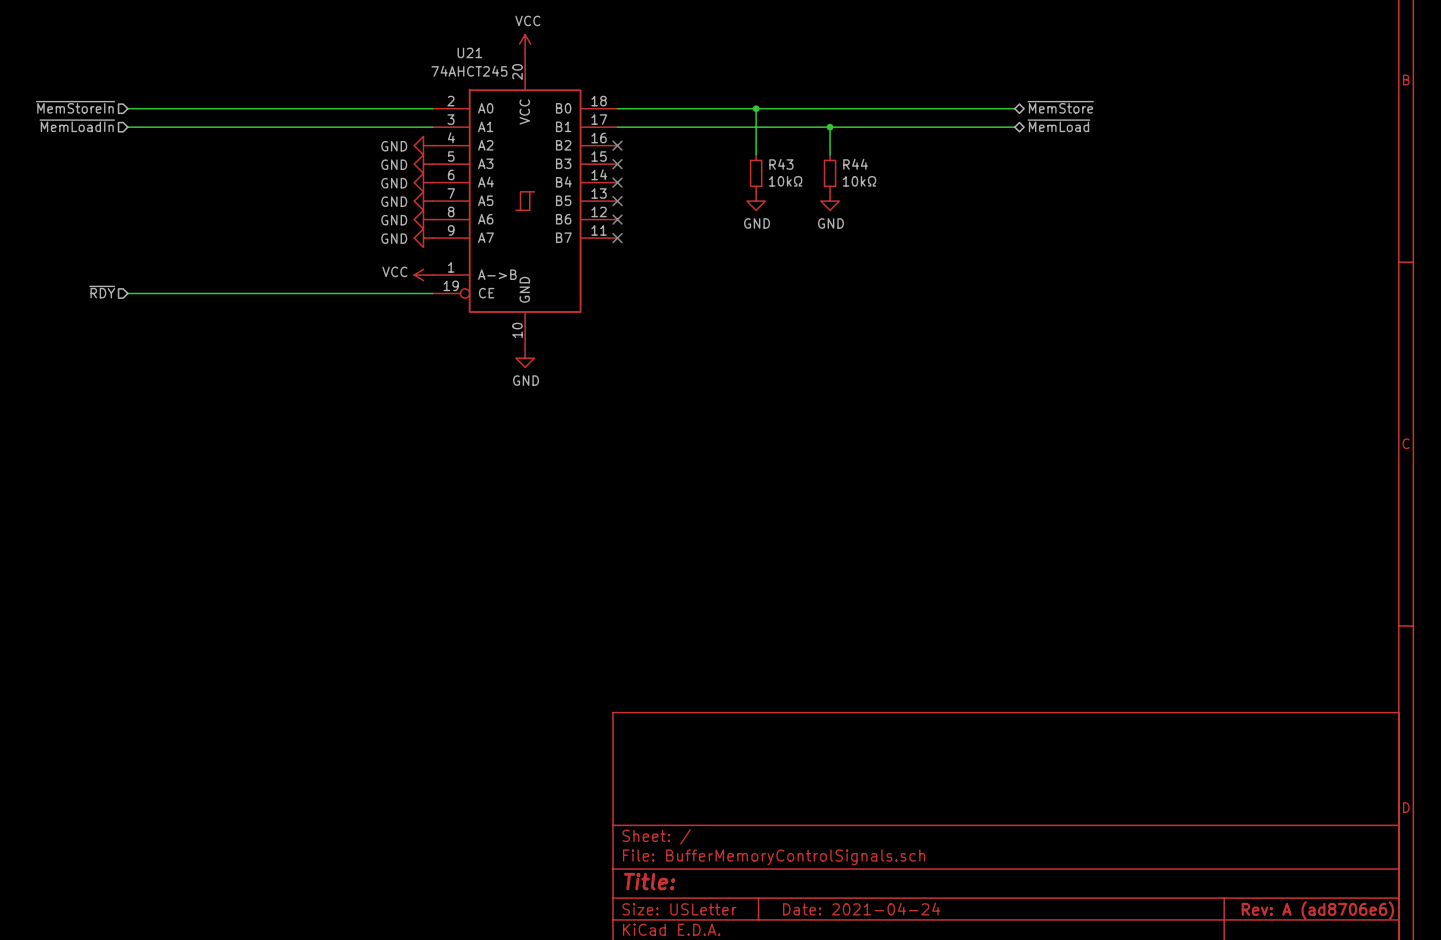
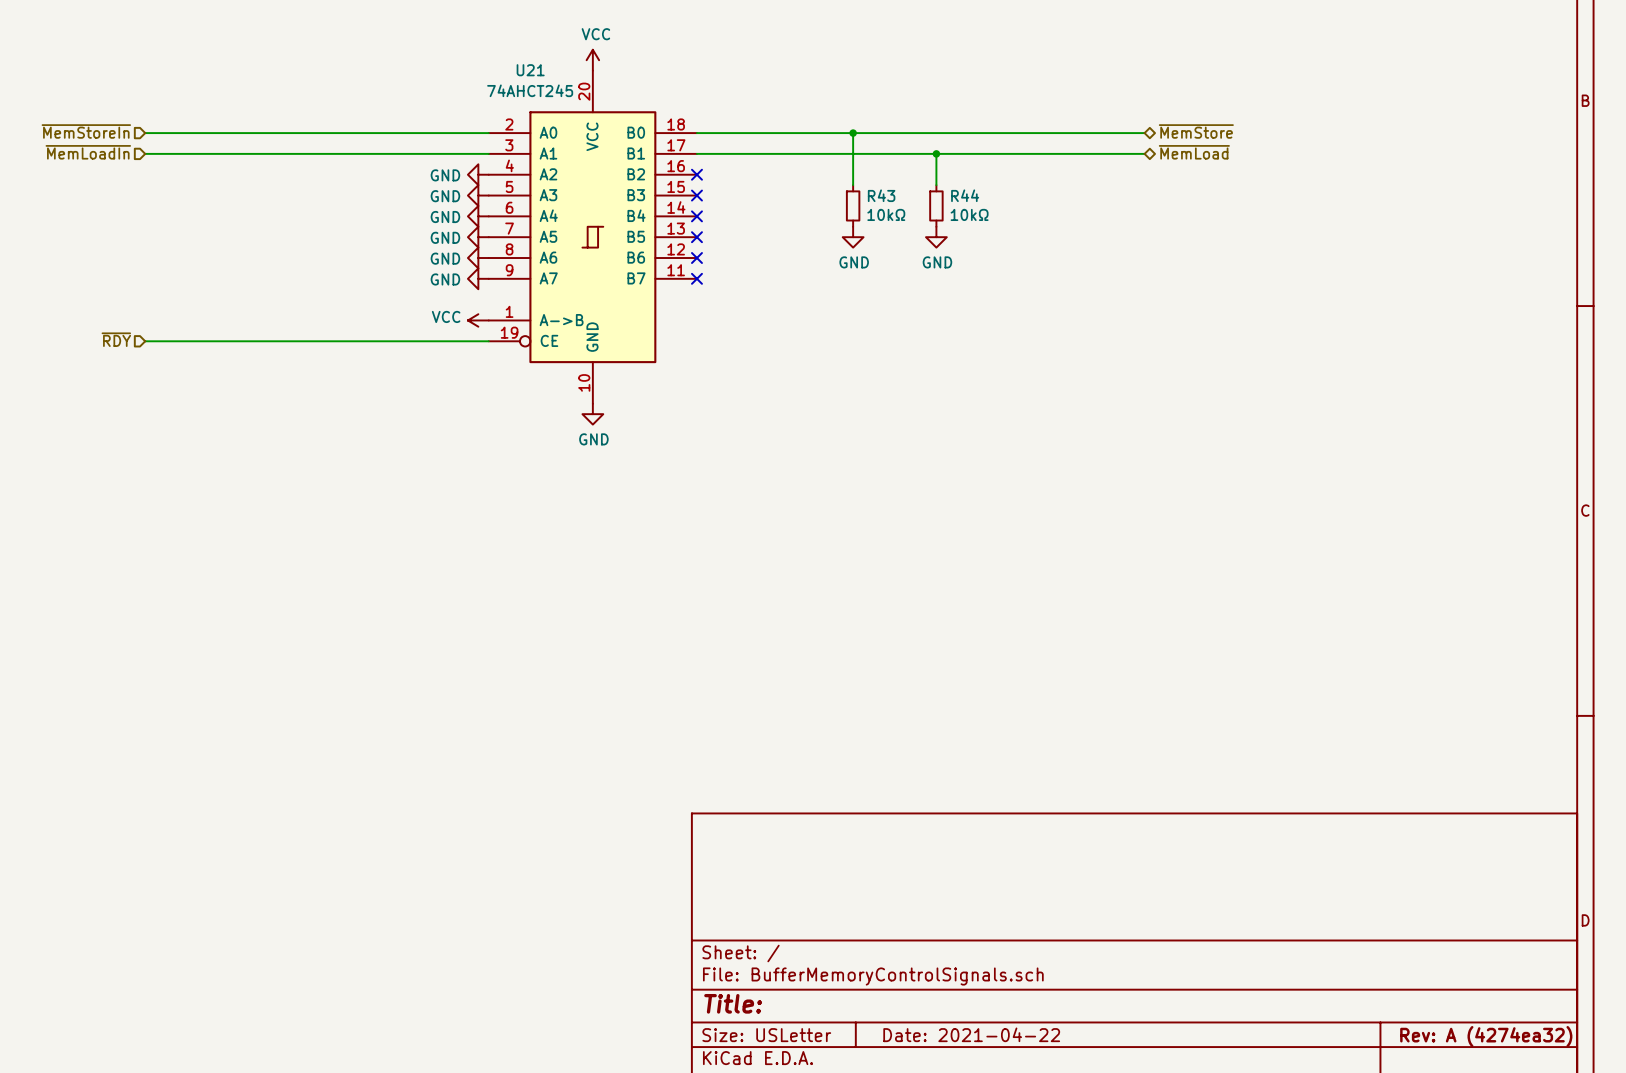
title block: Date: 2021-04-24 (861, 909) -> Date: 2021-04-22 (971, 1034)
title block: Rev: A (ad8706e6) (1317, 910) -> Rev: A (4274ea32) (1486, 1036)

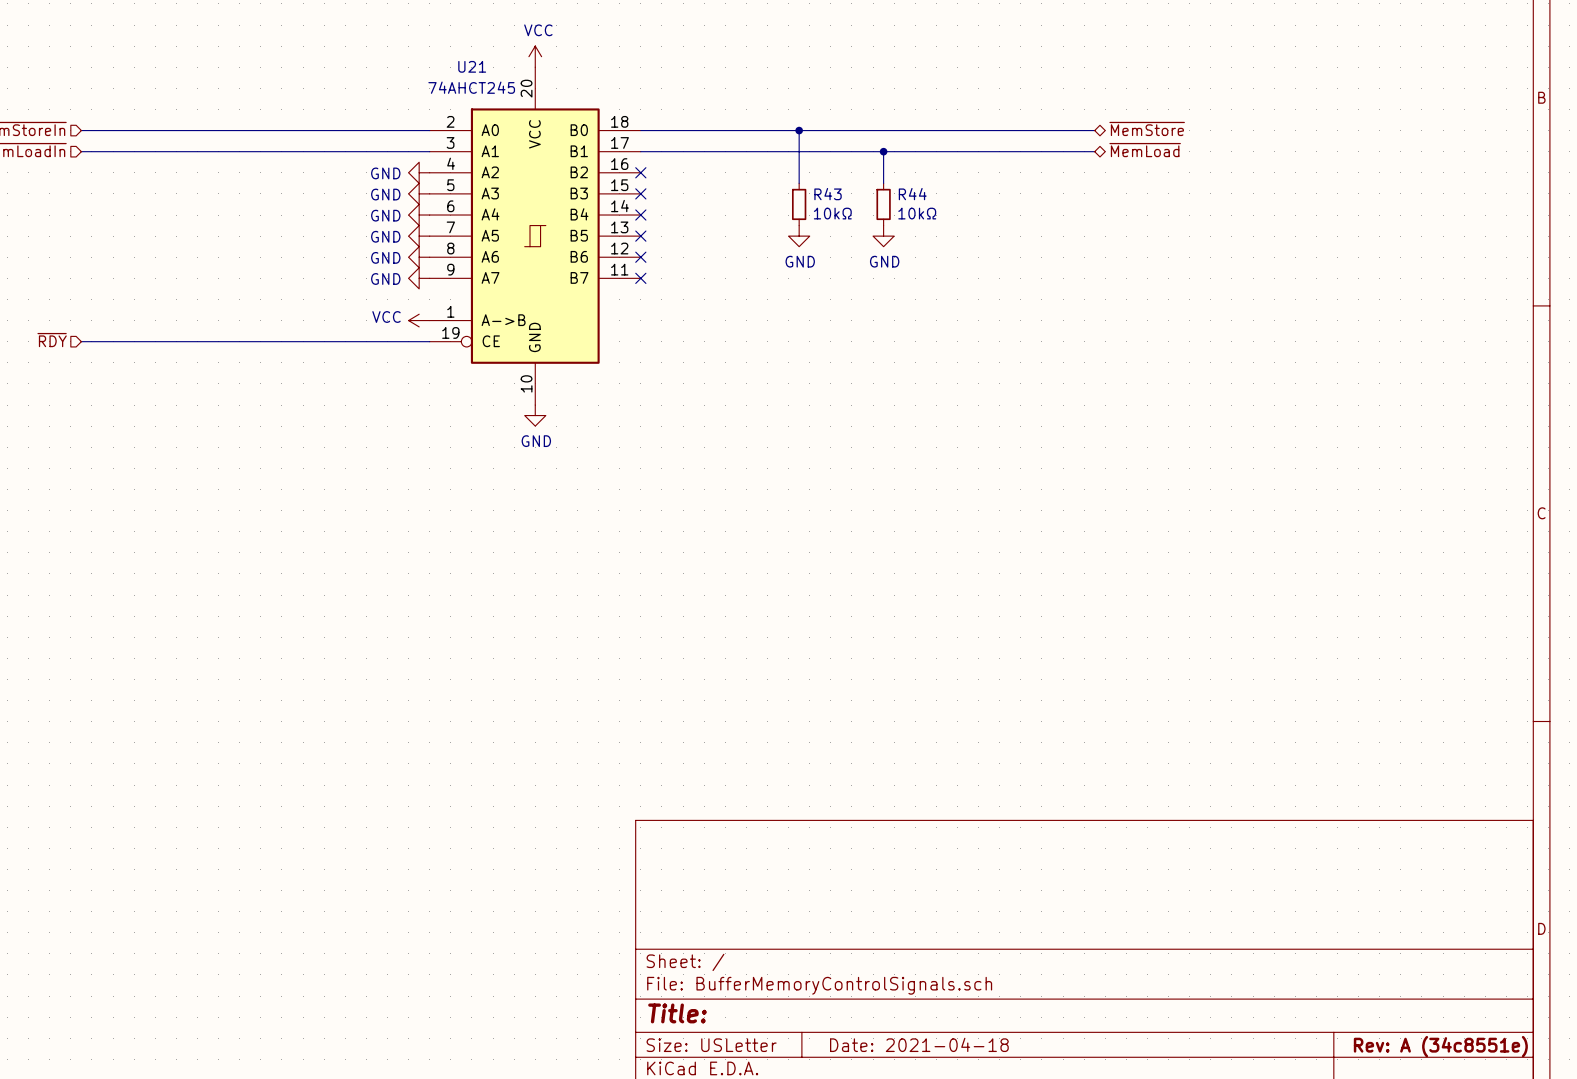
title block: Date: 2021-04-22 (971, 1034) -> Date: 2021-04-18 (919, 1044)
title block: Rev: A (4274ea32) (1486, 1036) -> Rev: A (34c8551e) (1440, 1046)

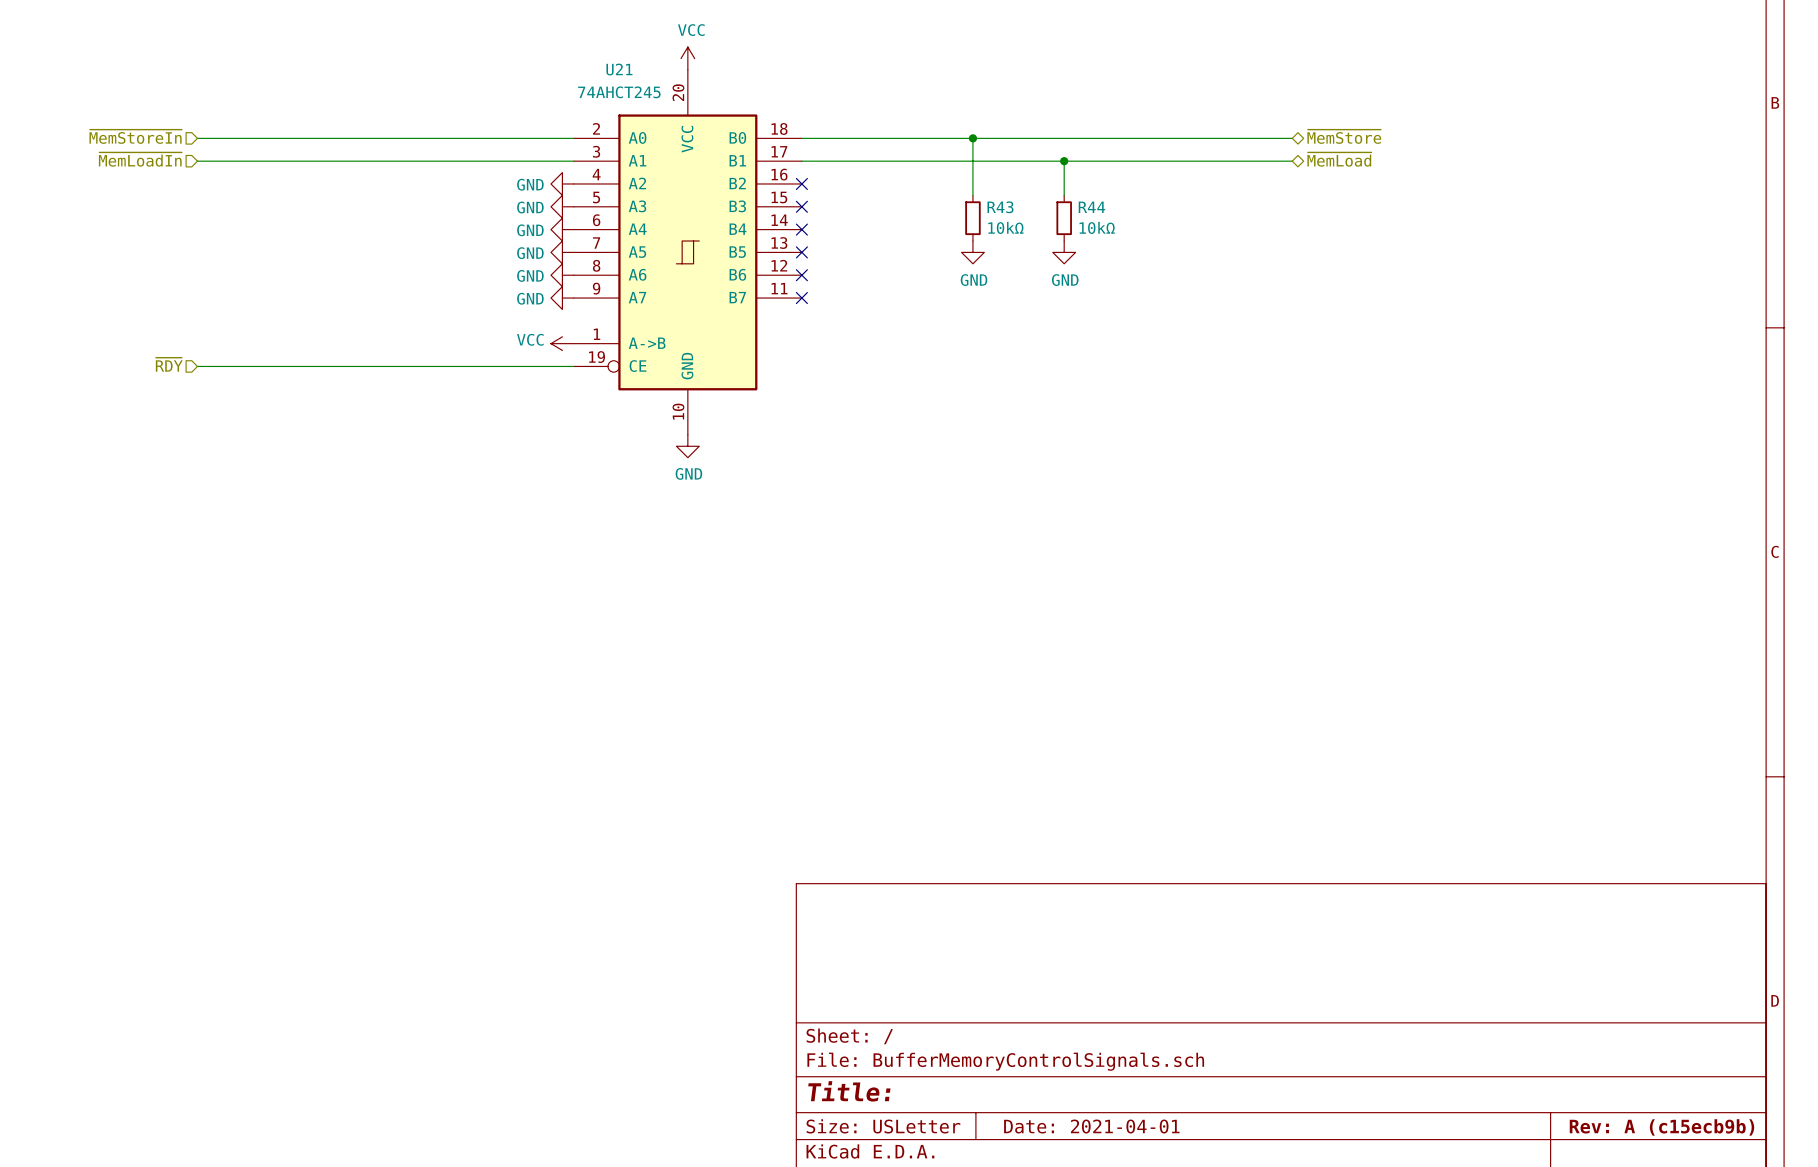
title block: Date: 2021-04-18 (919, 1044) -> Date: 2021-04-01 (1091, 1126)
title block: Rev: A (34c8551e) (1440, 1046) -> Rev: A (c15ecb9b) (1661, 1127)

